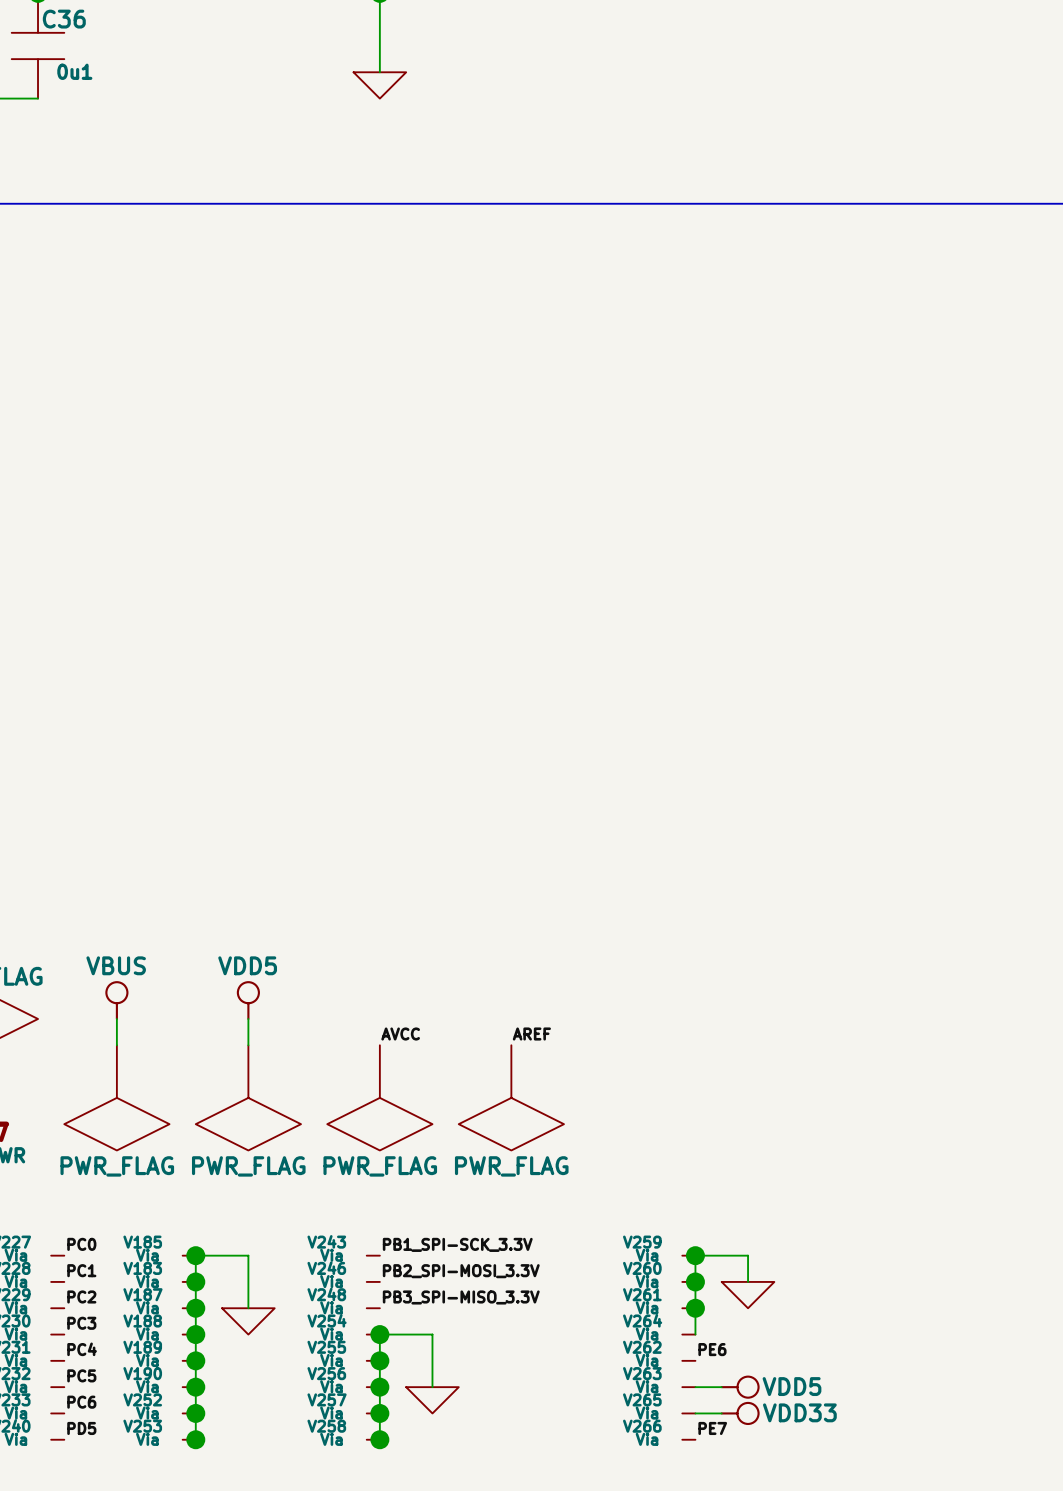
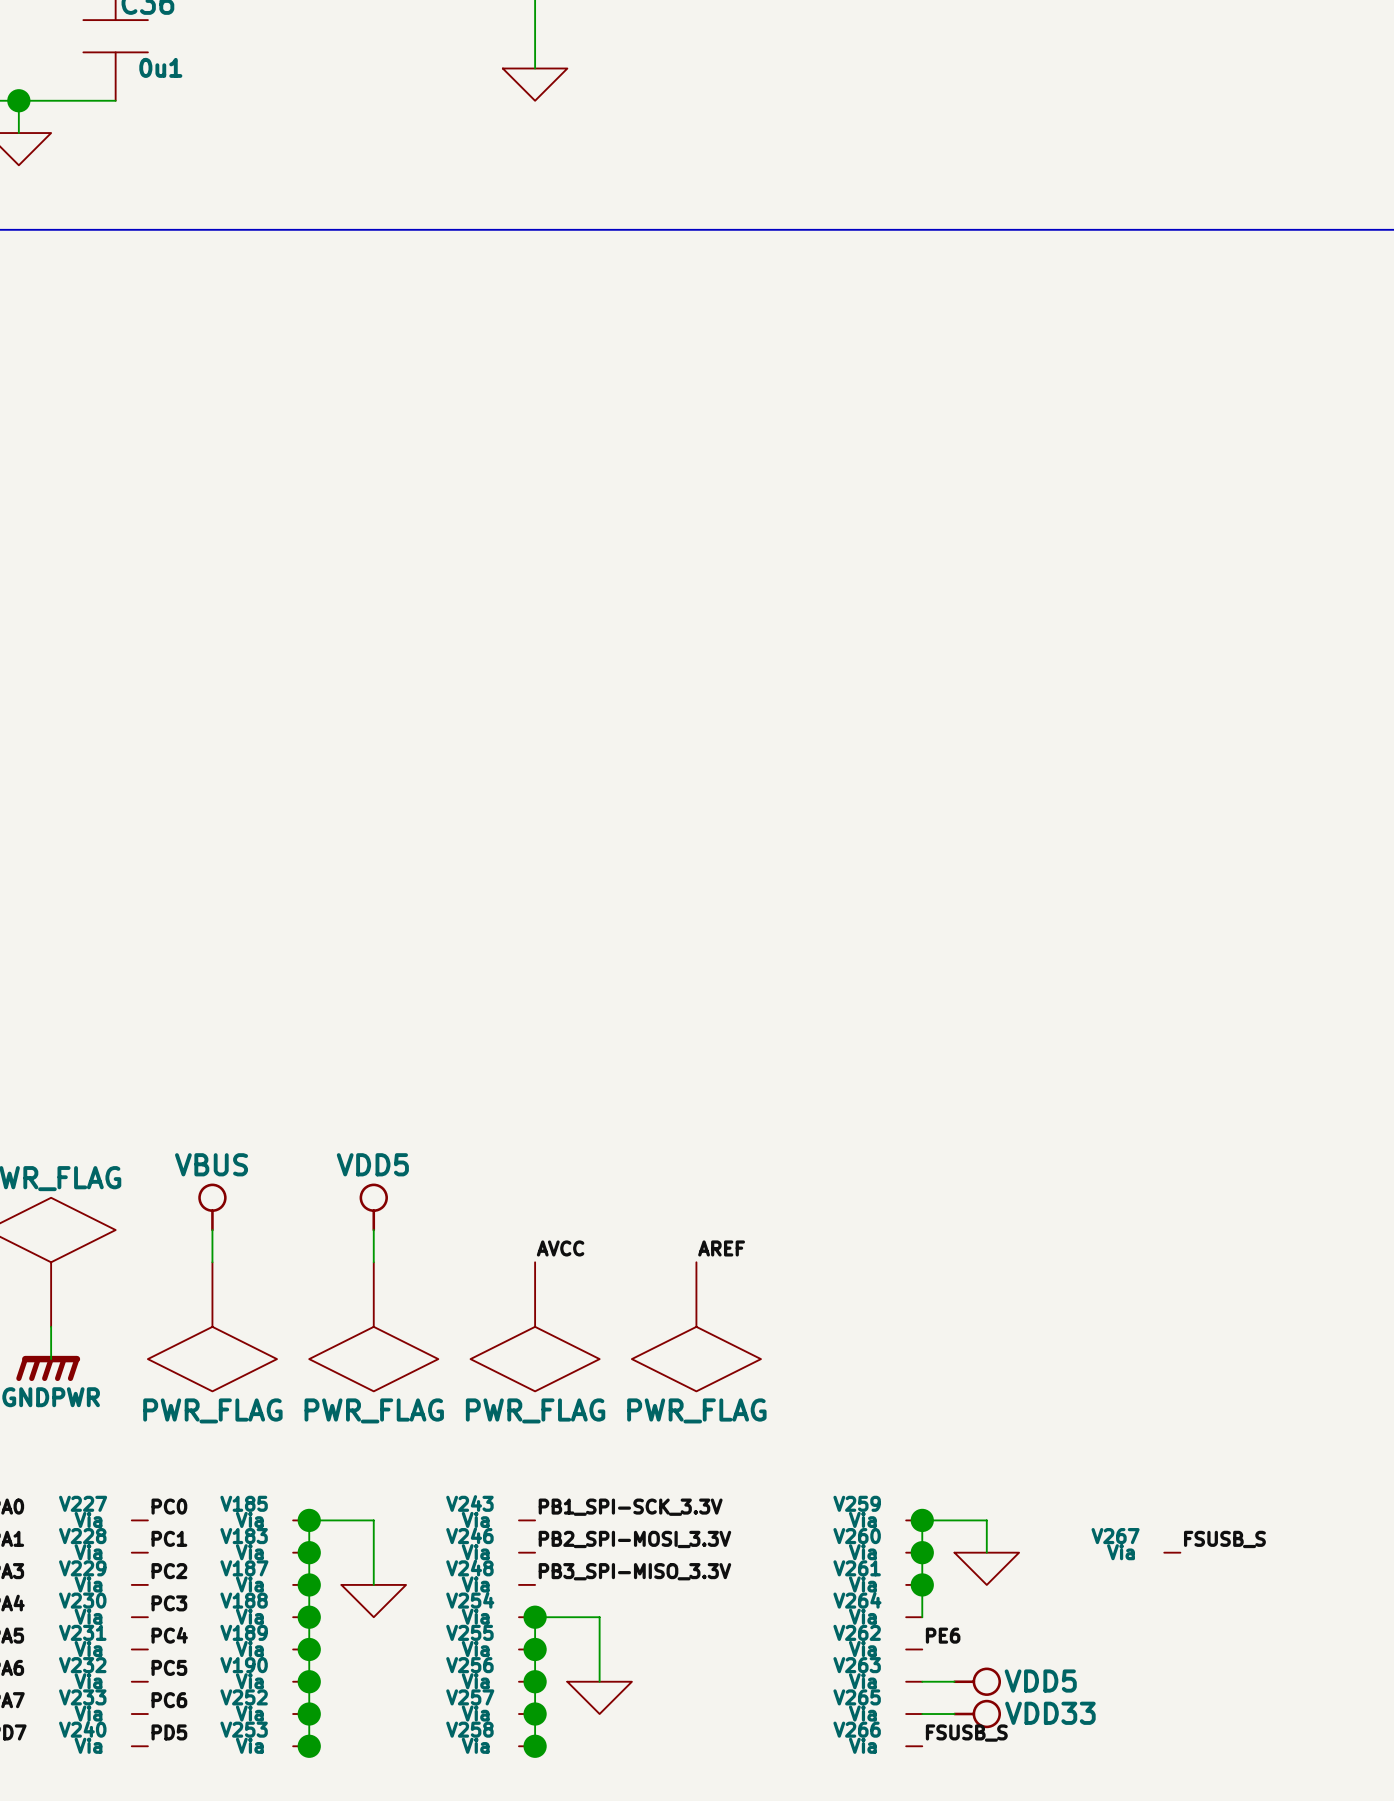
label: none -> FSUSB_S (1224, 1539)
V267: none -> (1172, 1552)
label: PE7 (712, 1428) -> FSUSB_S (966, 1733)

